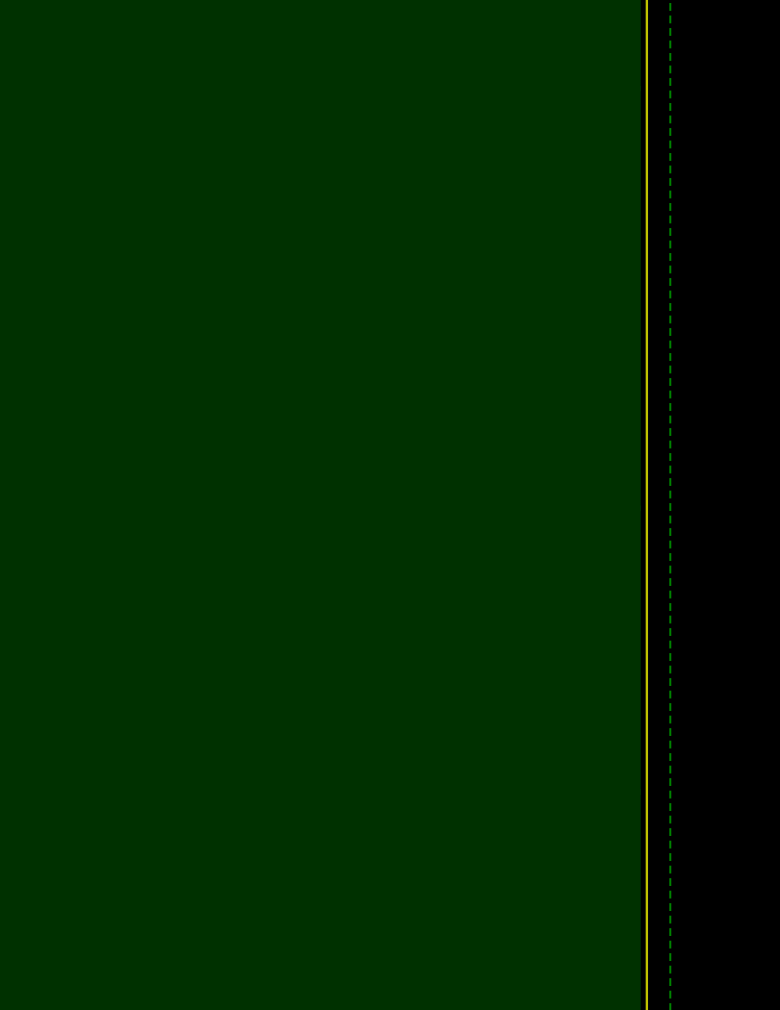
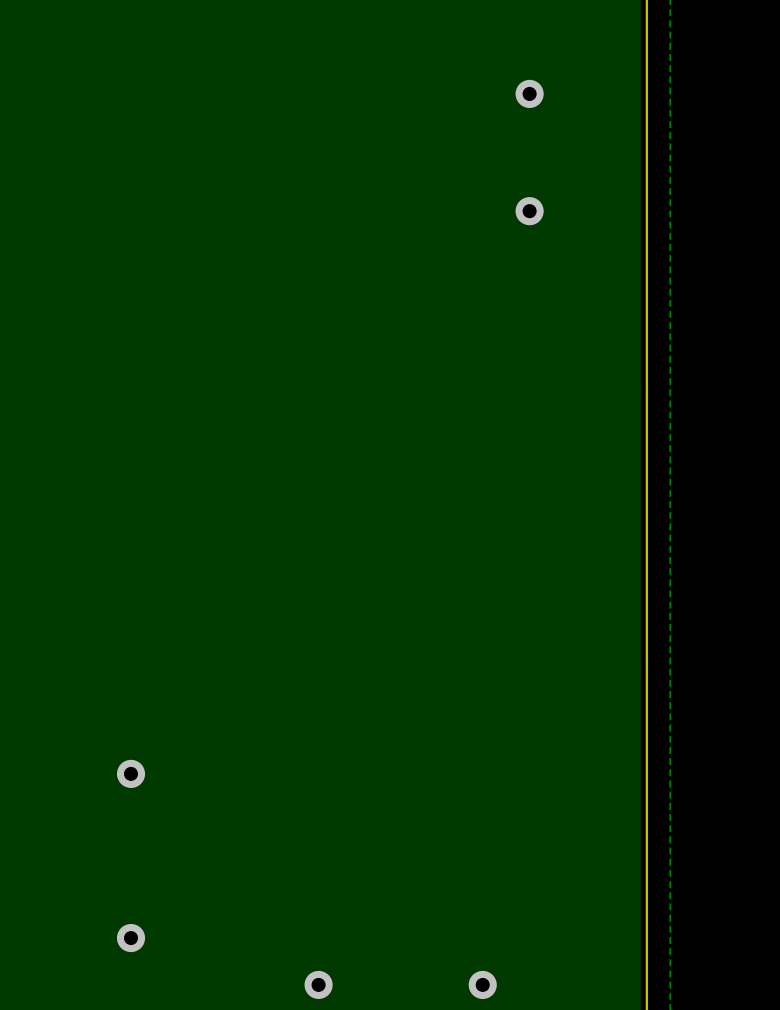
via: none -> (529, 93)
via: none -> (529, 211)
via: none -> (131, 773)
via: none -> (131, 938)
via: none -> (318, 984)
via: none -> (482, 984)

